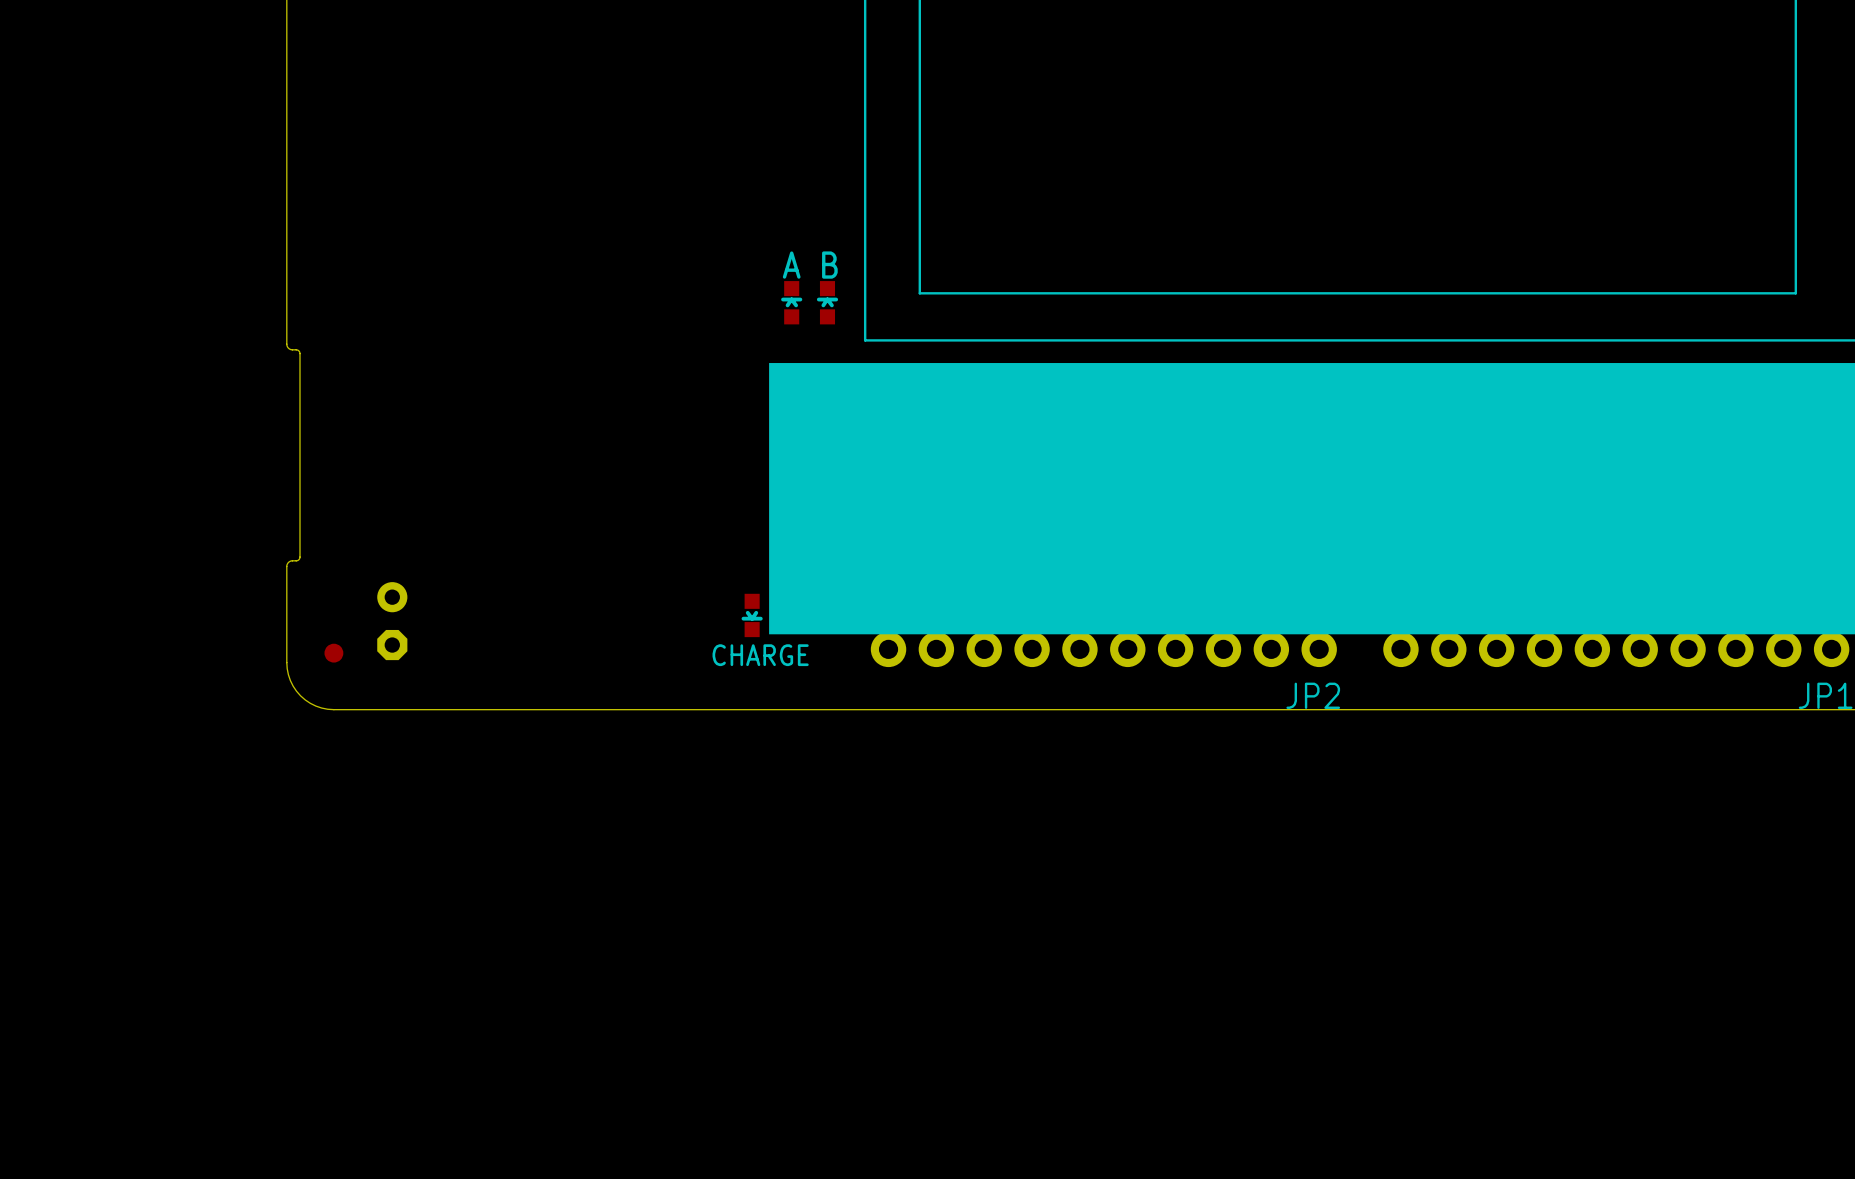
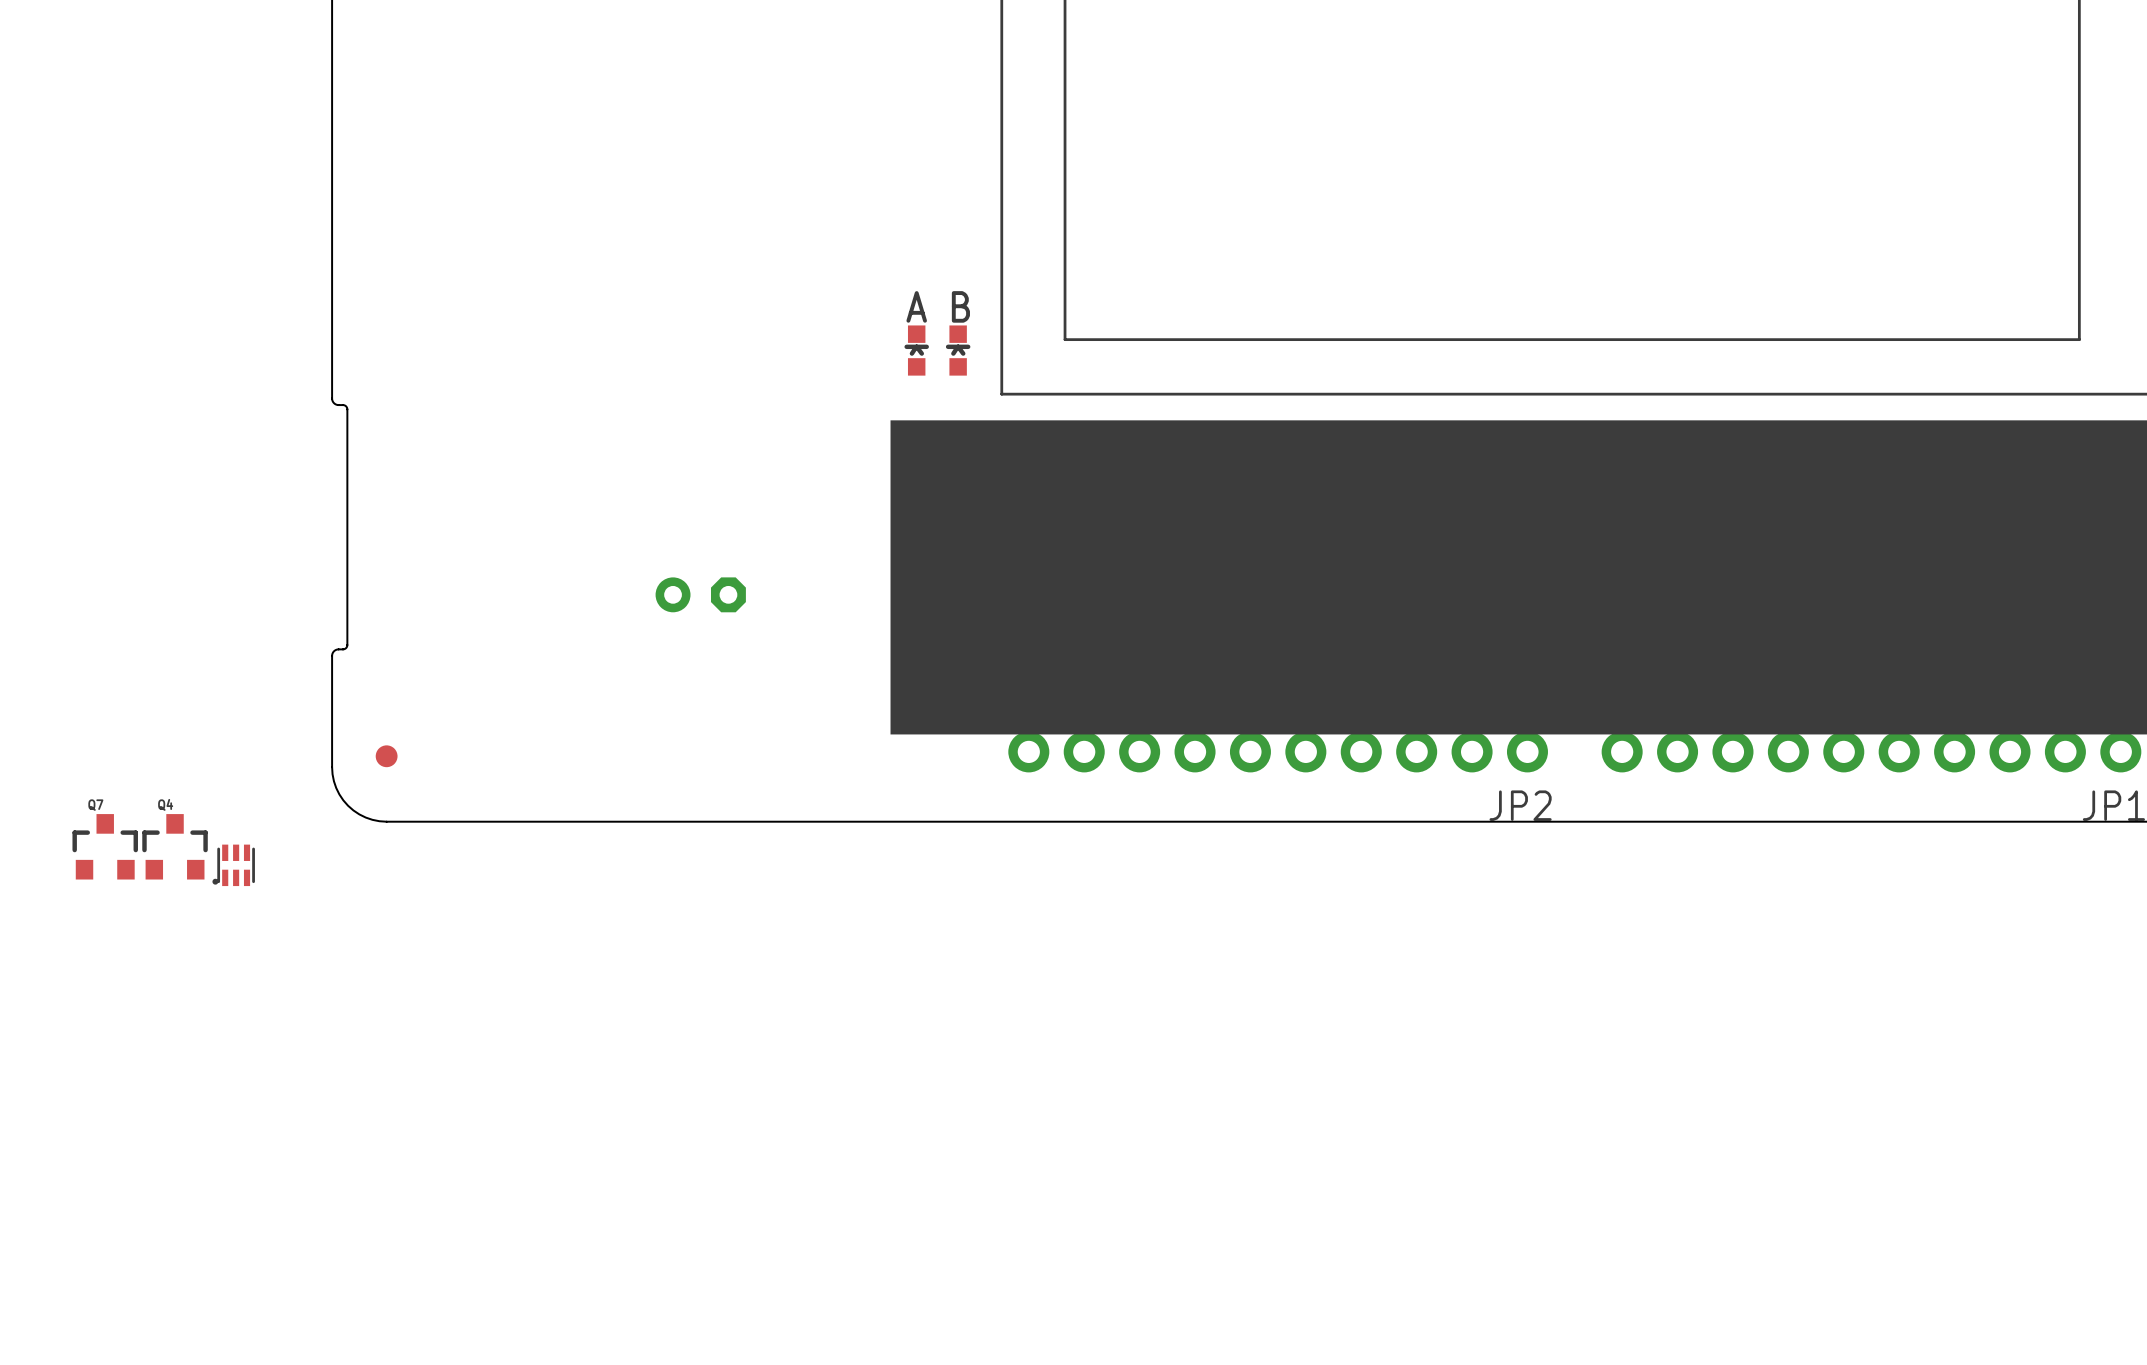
part: (752, 615) -> none
part rotation: 0° (392, 621) -> 90° counterclockwise (700, 594)
part position: (392, 621) -> (700, 594)
text: CHARGE (760, 655) -> none
Q7: none -> (105, 846)
Q4: none -> (175, 846)
part: none -> (233, 865)

